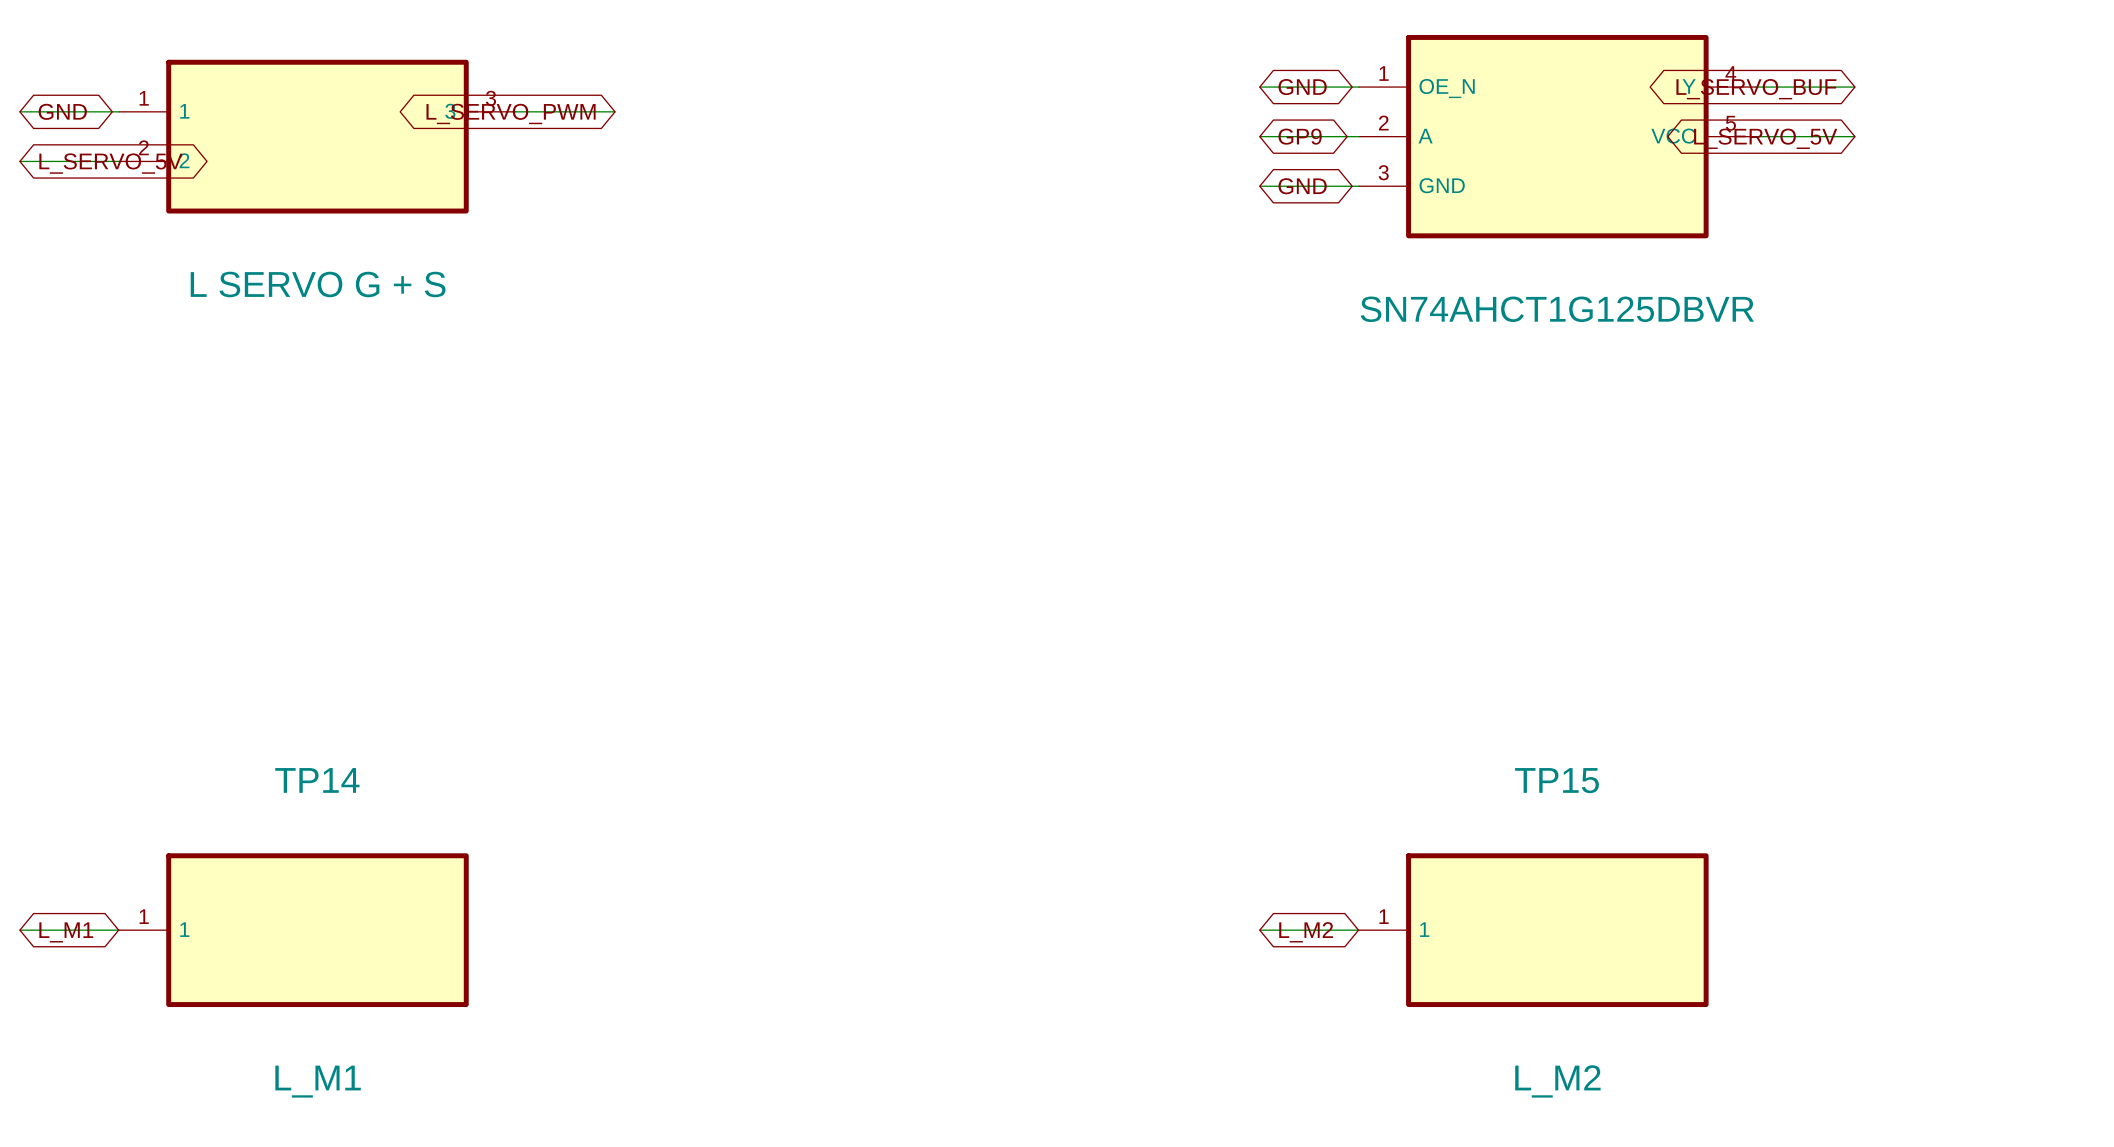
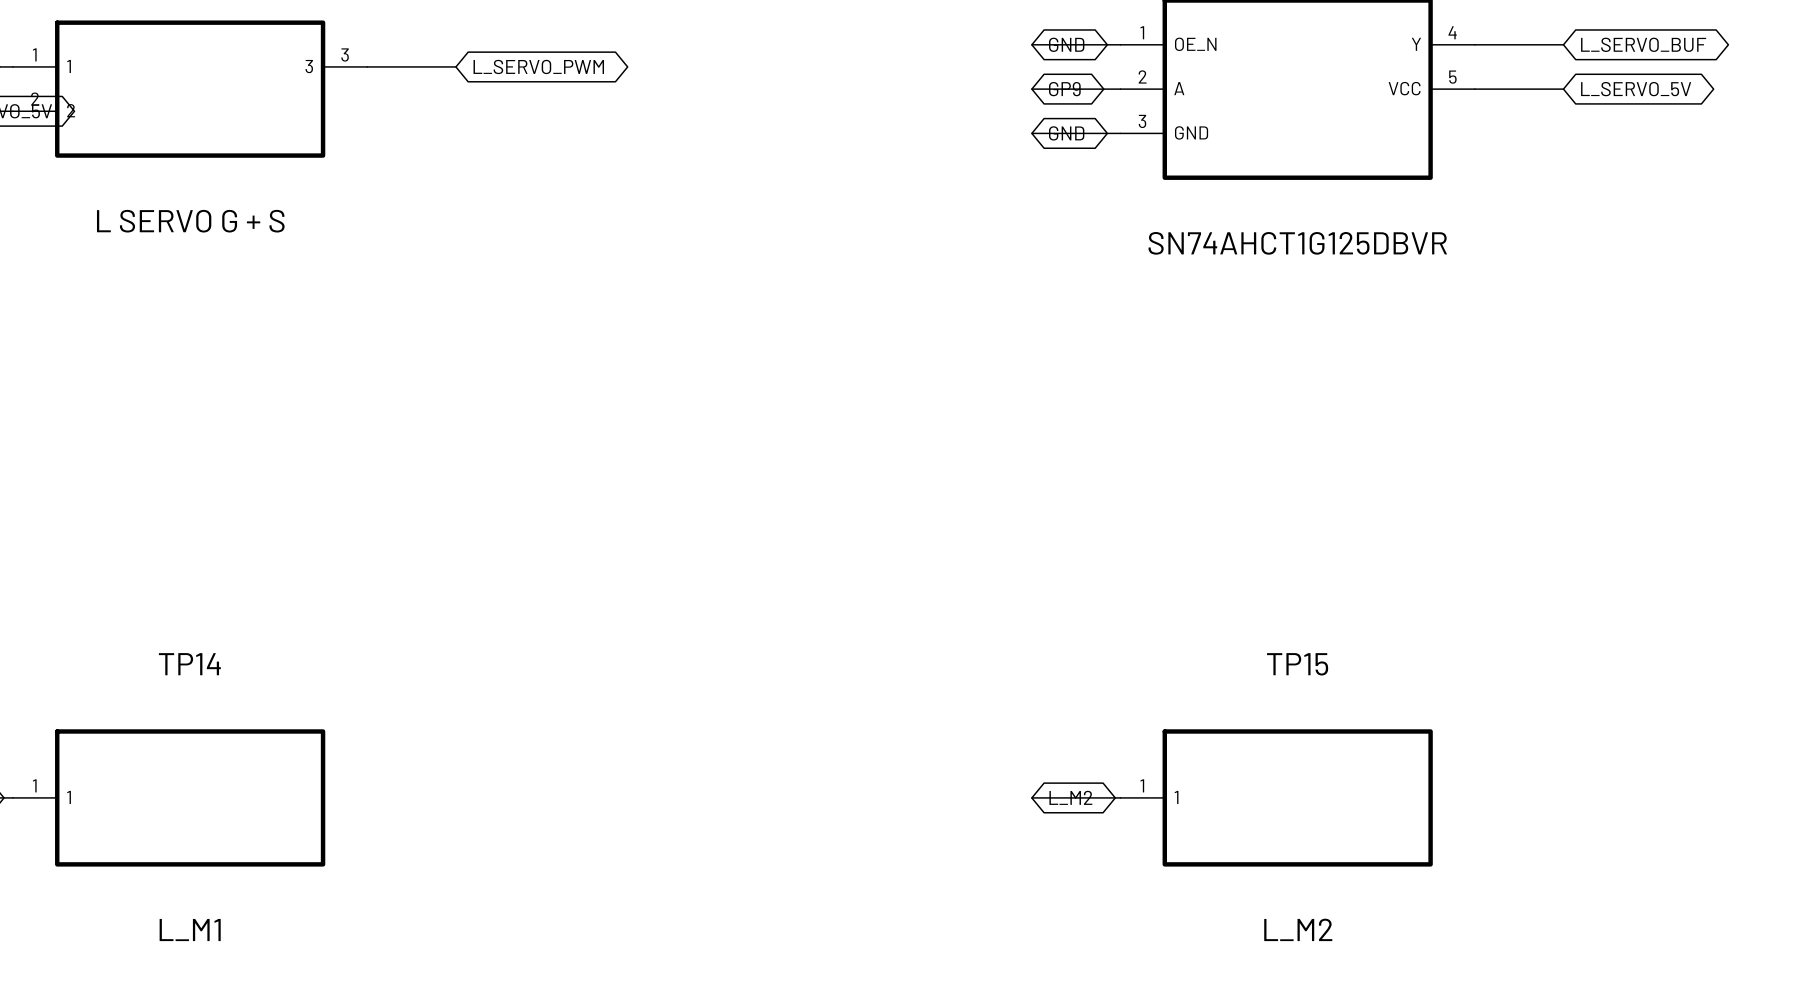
global label rotation: 0° (1756, 89) -> 180° (1643, 44)
global label rotation: 0° (511, 113) -> 180° (538, 66)
global label rotation: 0° (1765, 138) -> 180° (1636, 89)
global label position: L_SERVO_5V (1765, 138) -> L_SERVO_5V (1636, 89)

